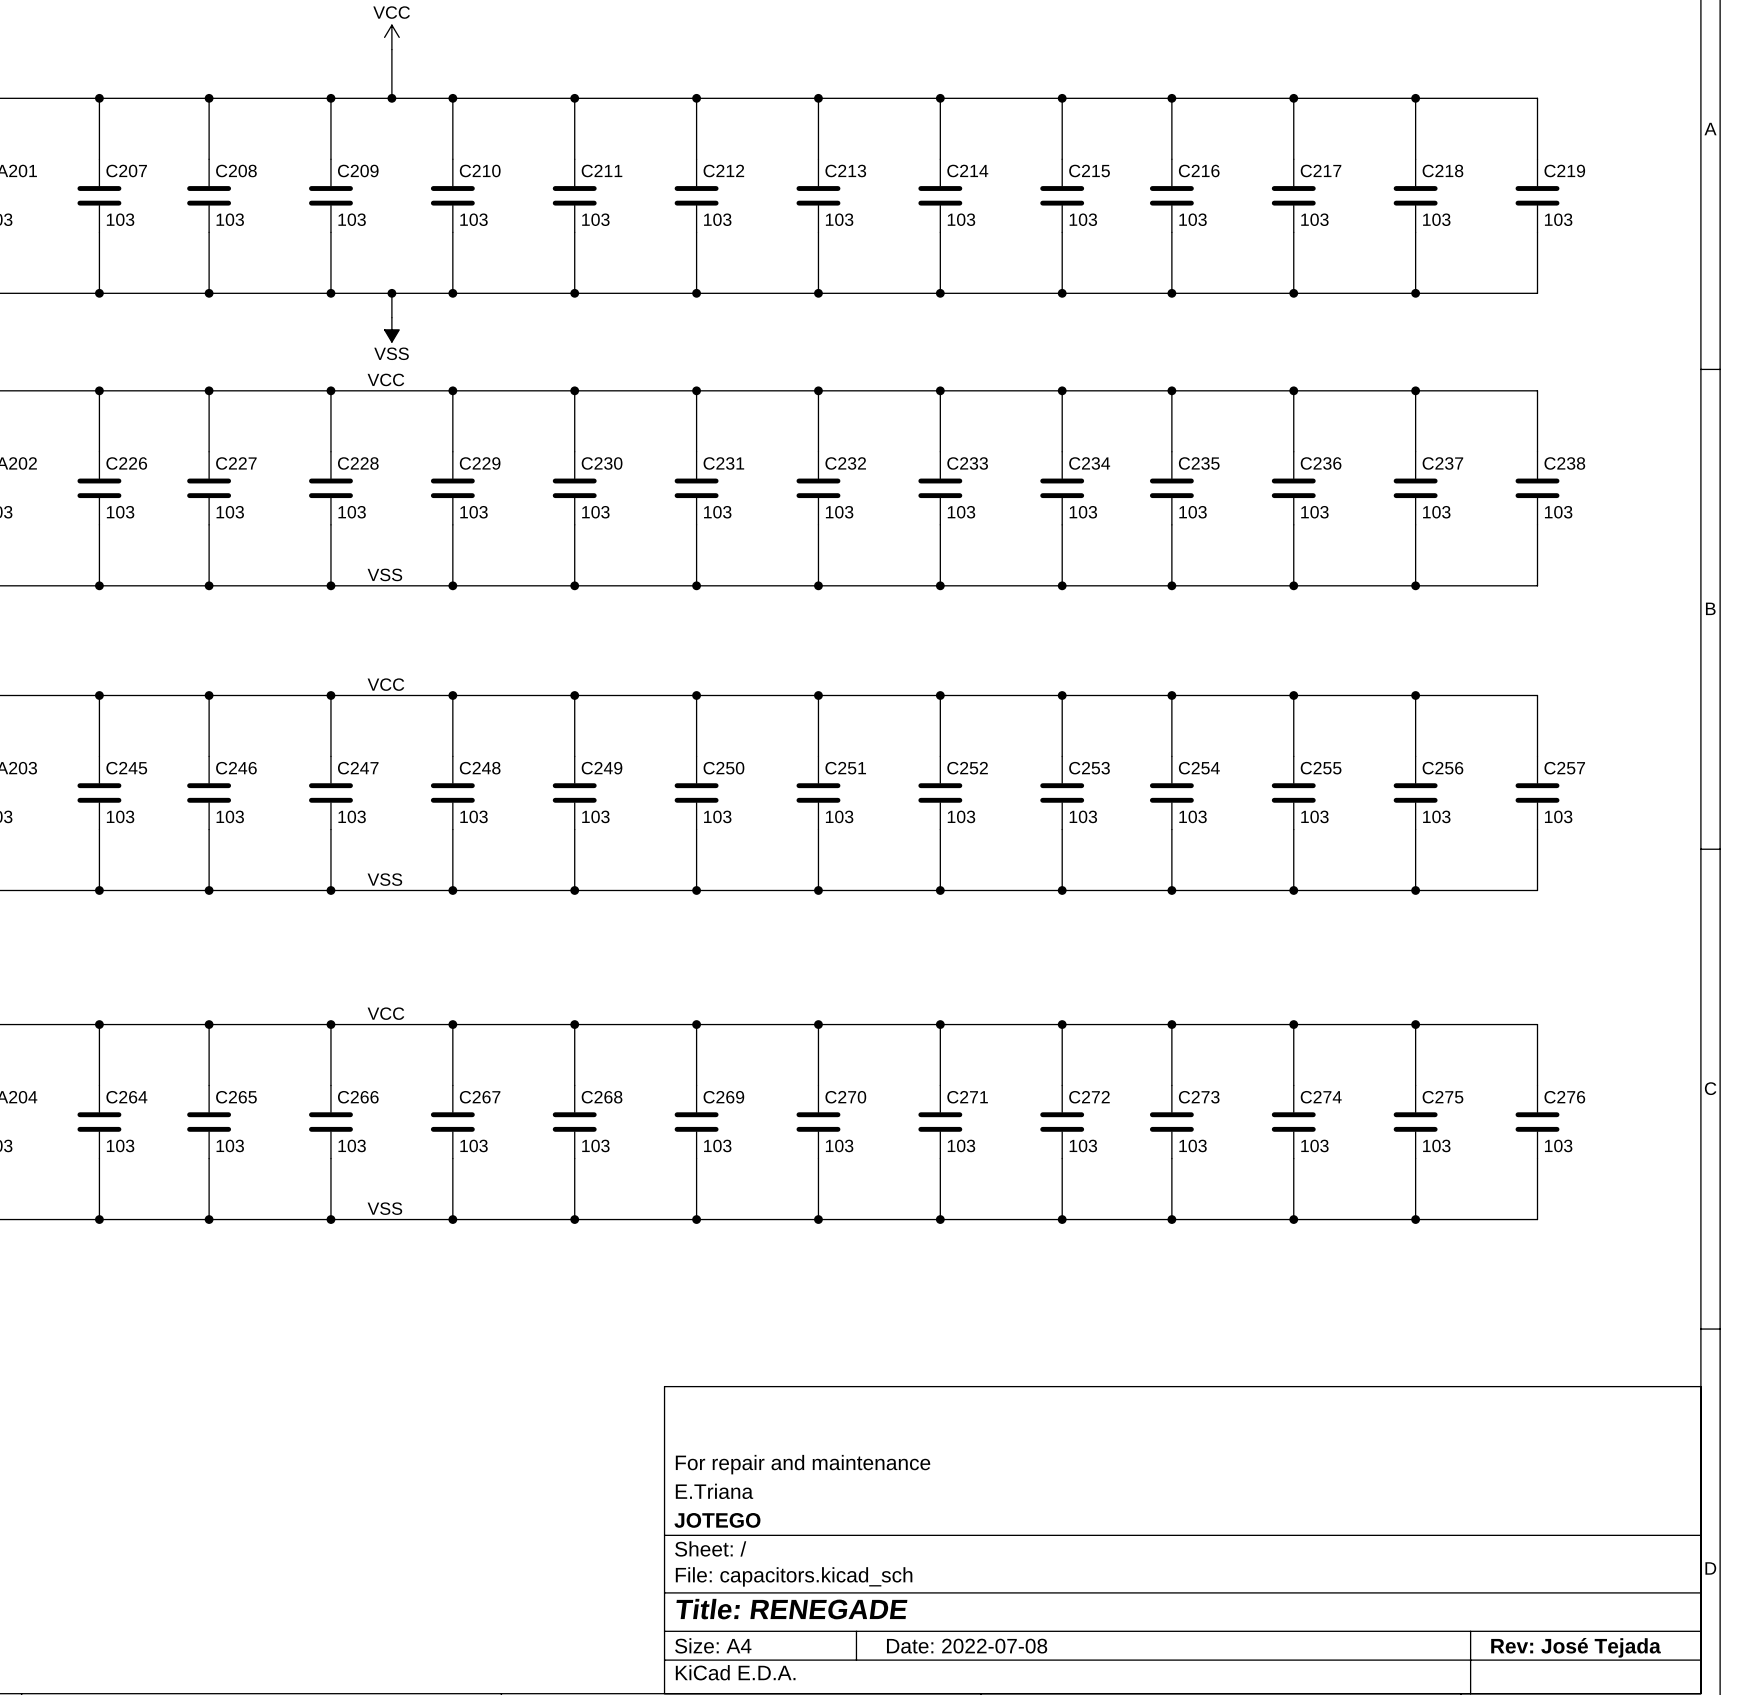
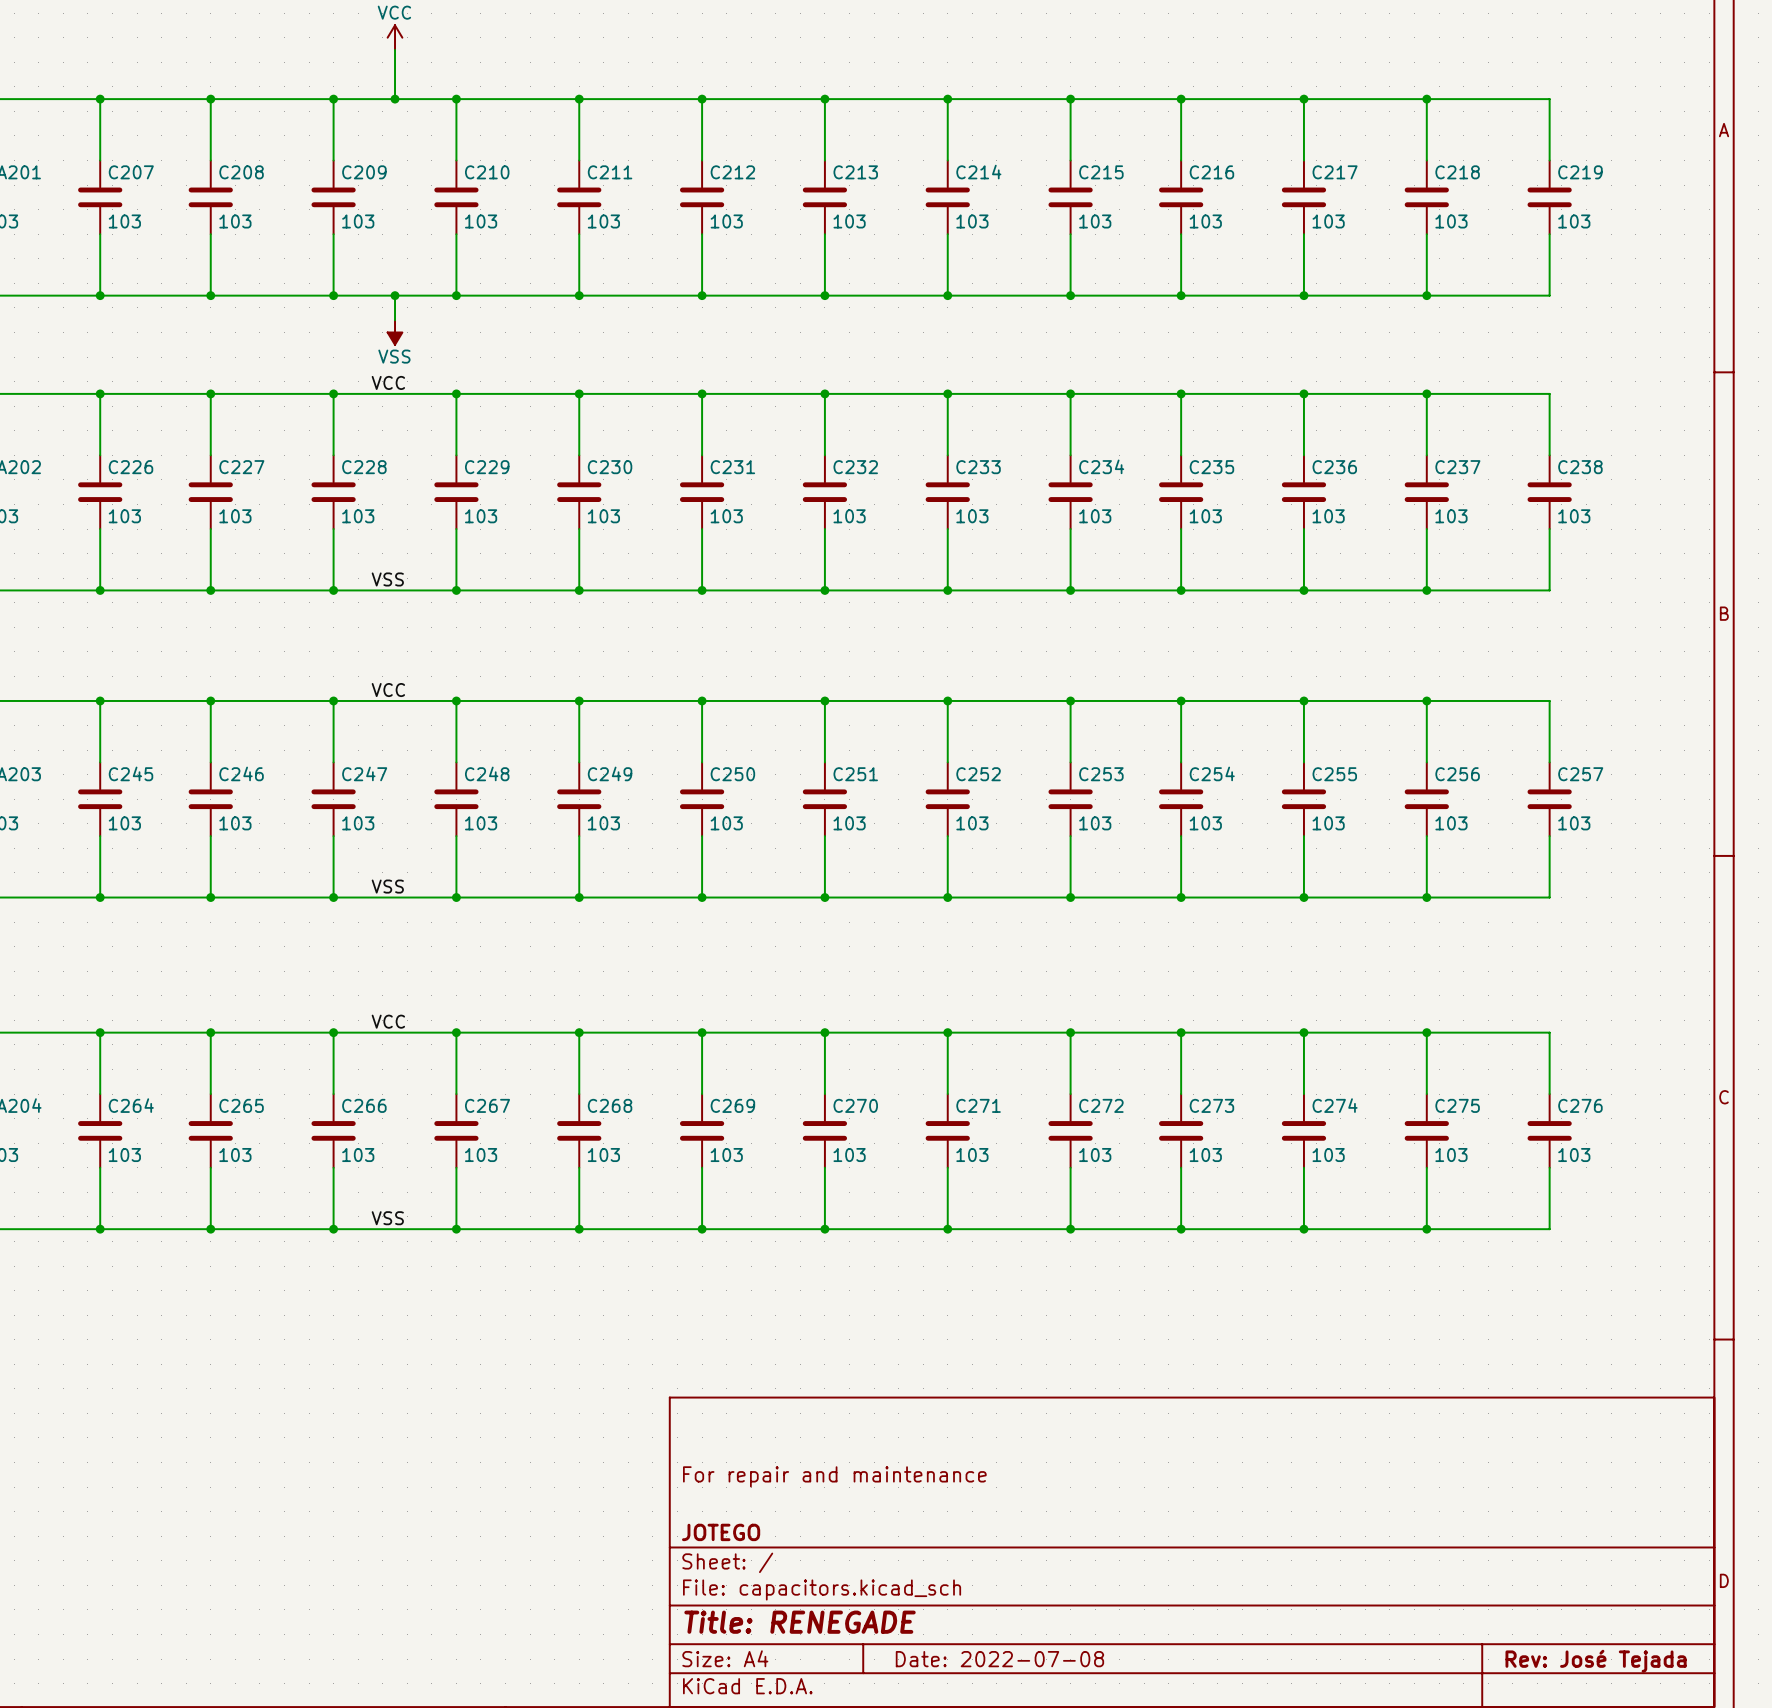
title block: E.Triana (714, 1491) -> none

